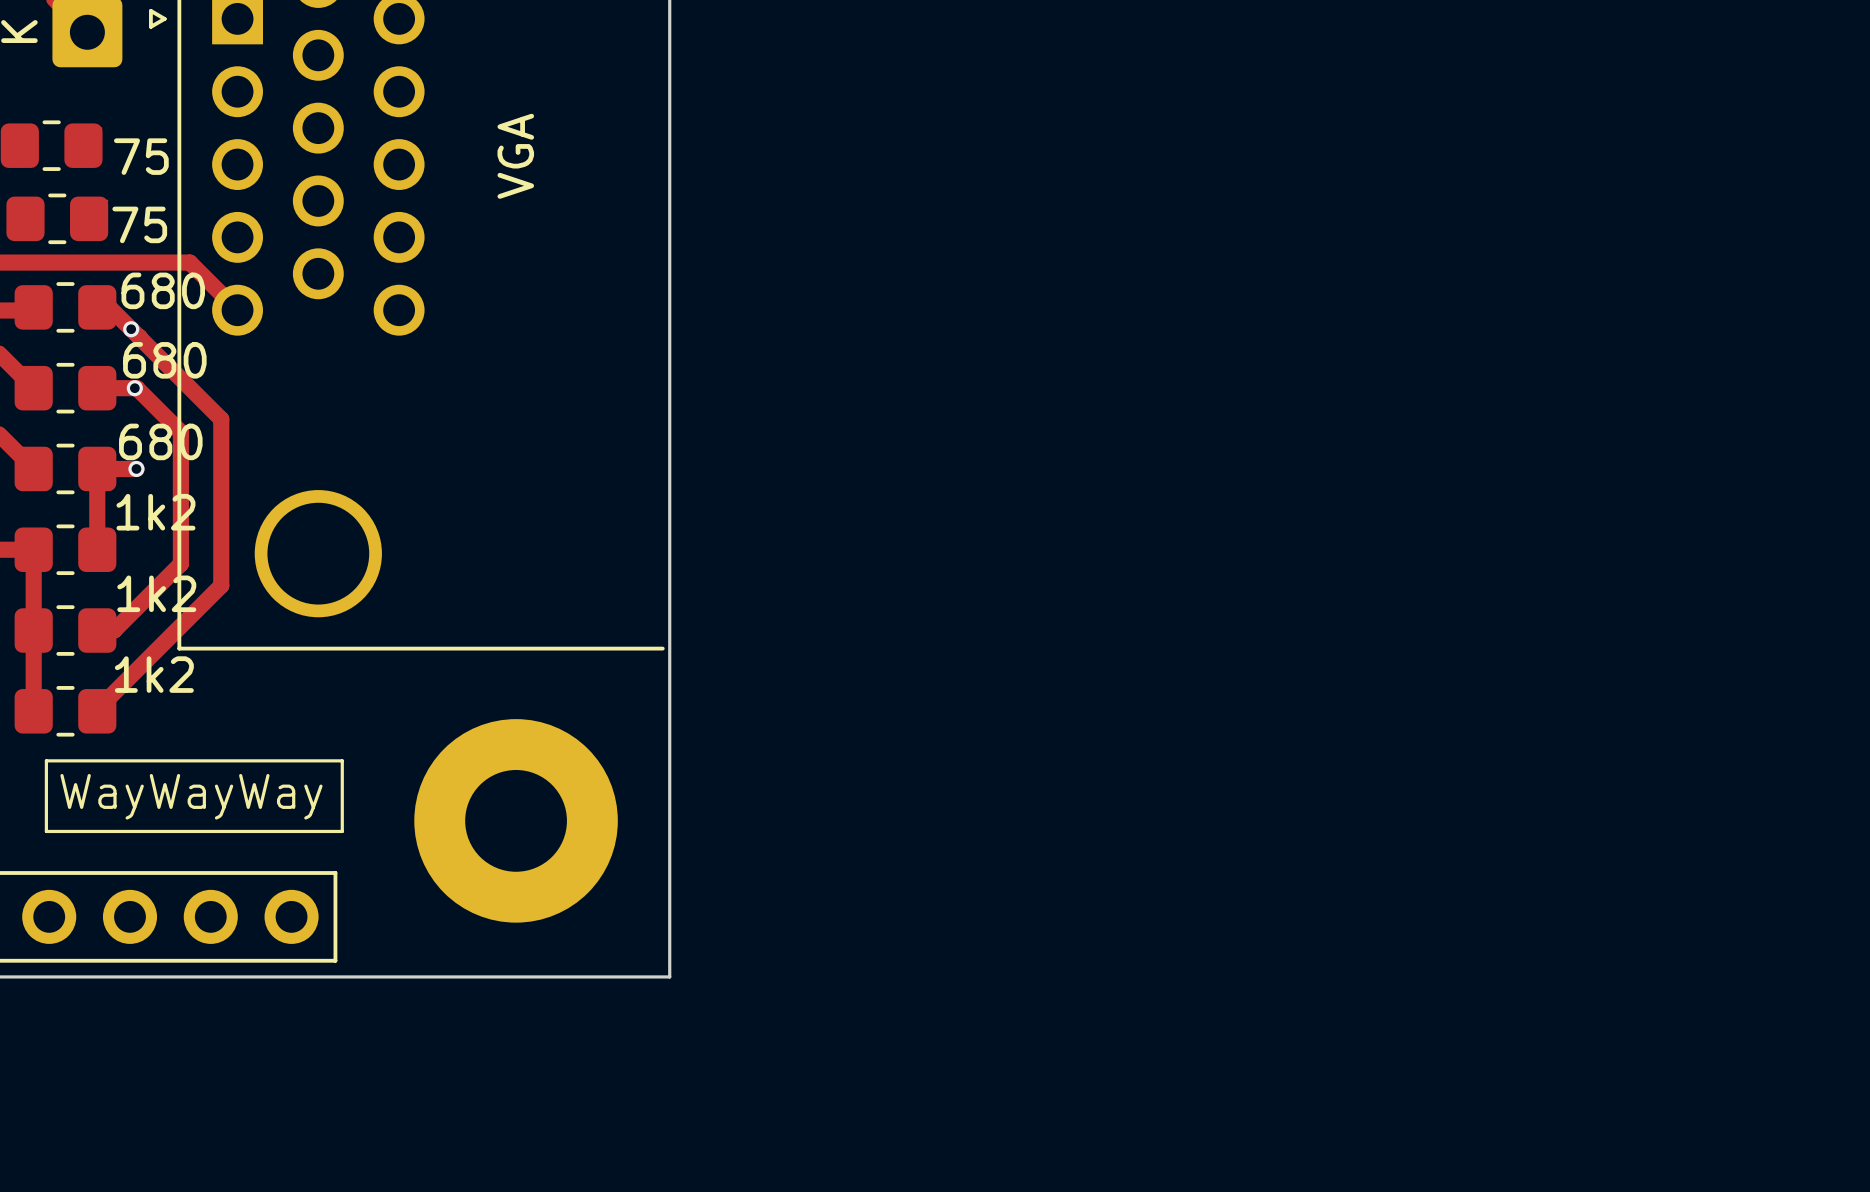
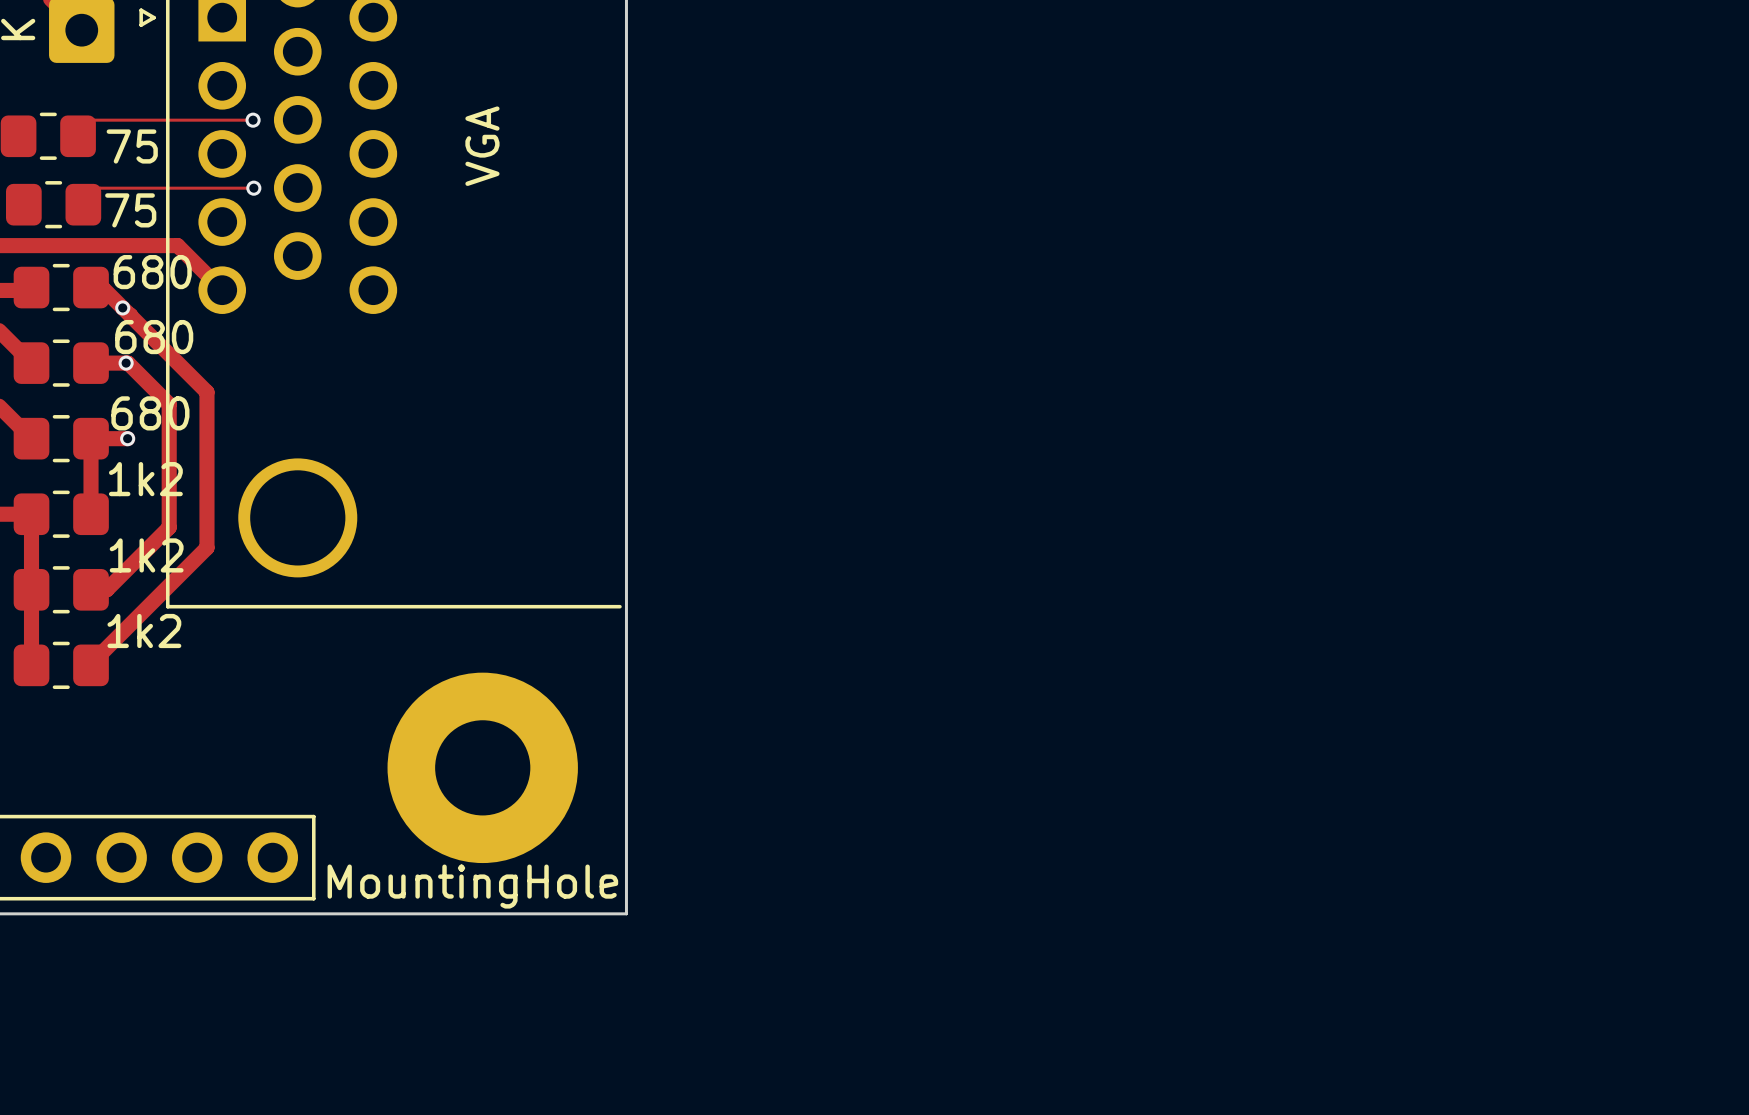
track: none -> (94, 120) (253, 120)
via: none -> (253, 120)
track: none -> (99, 188) (253, 188)
via: none -> (253, 188)
line: (46, 760) (342, 760) (342, 831) (46, 831) (46, 760) -> none
text: WayWayWay (191, 796) -> none
part value: none -> MountingHole (472, 886)

